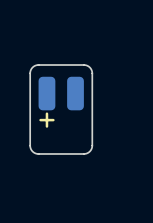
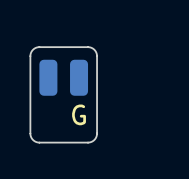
text: + (46, 120) -> none
G name: none -> G (79, 114)

